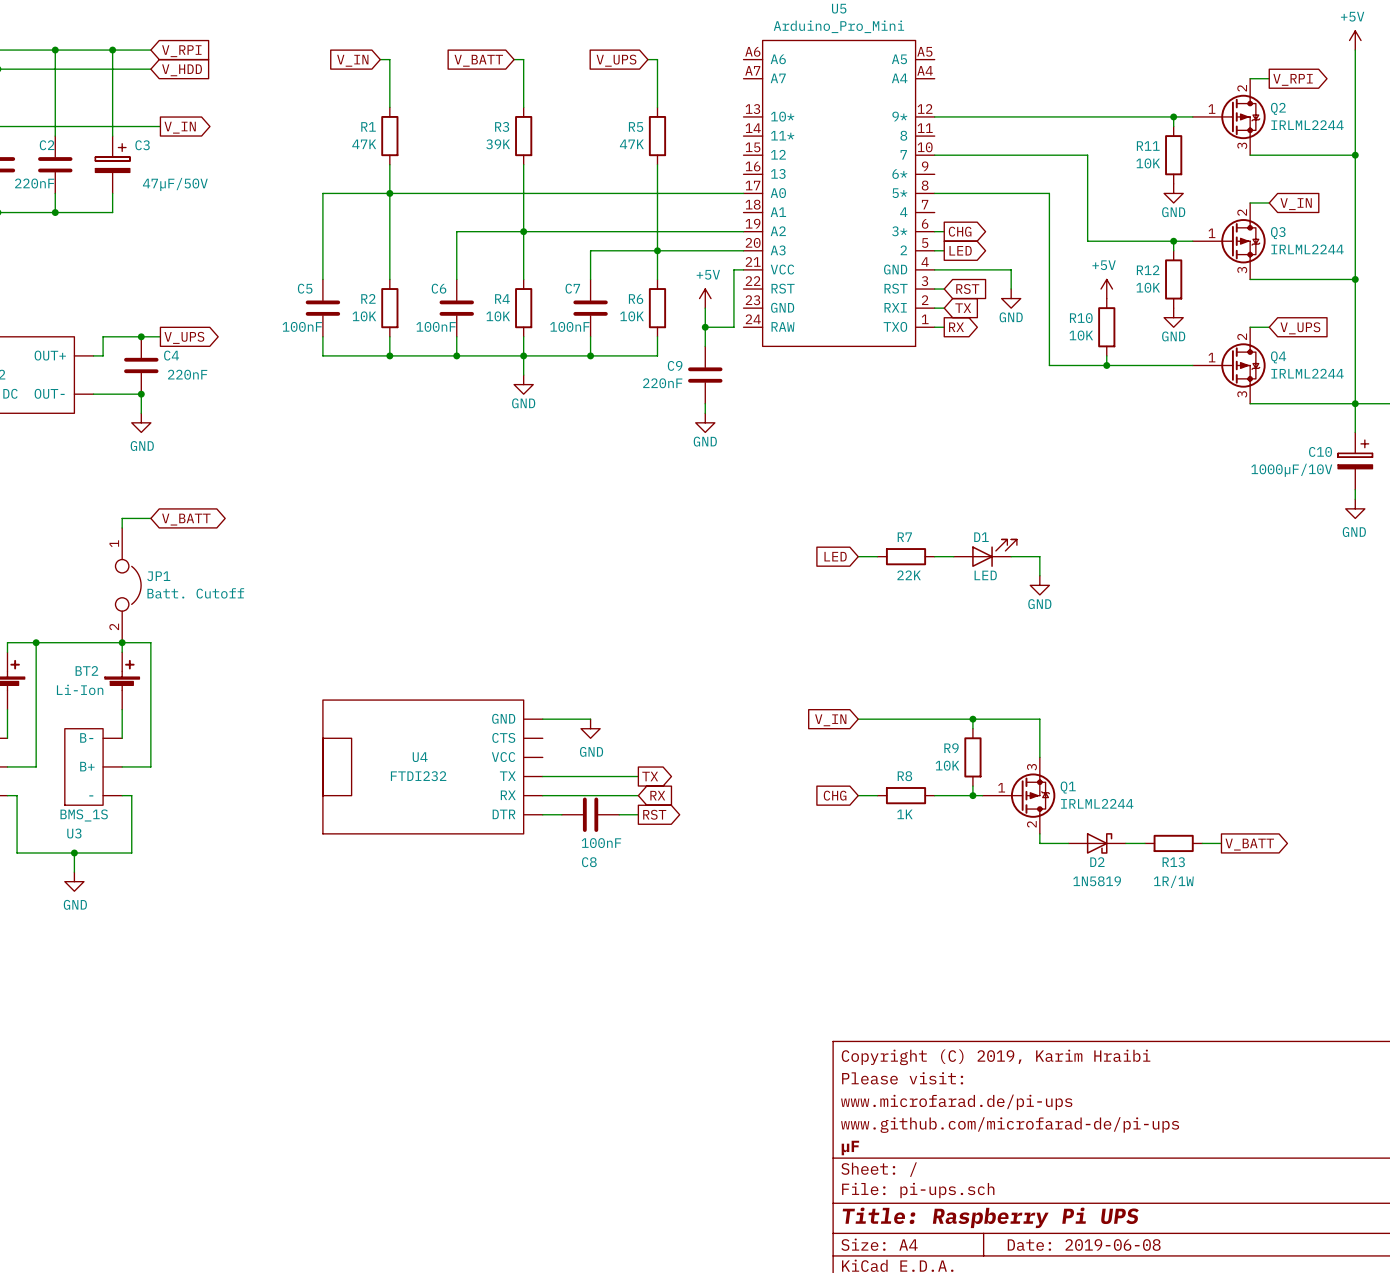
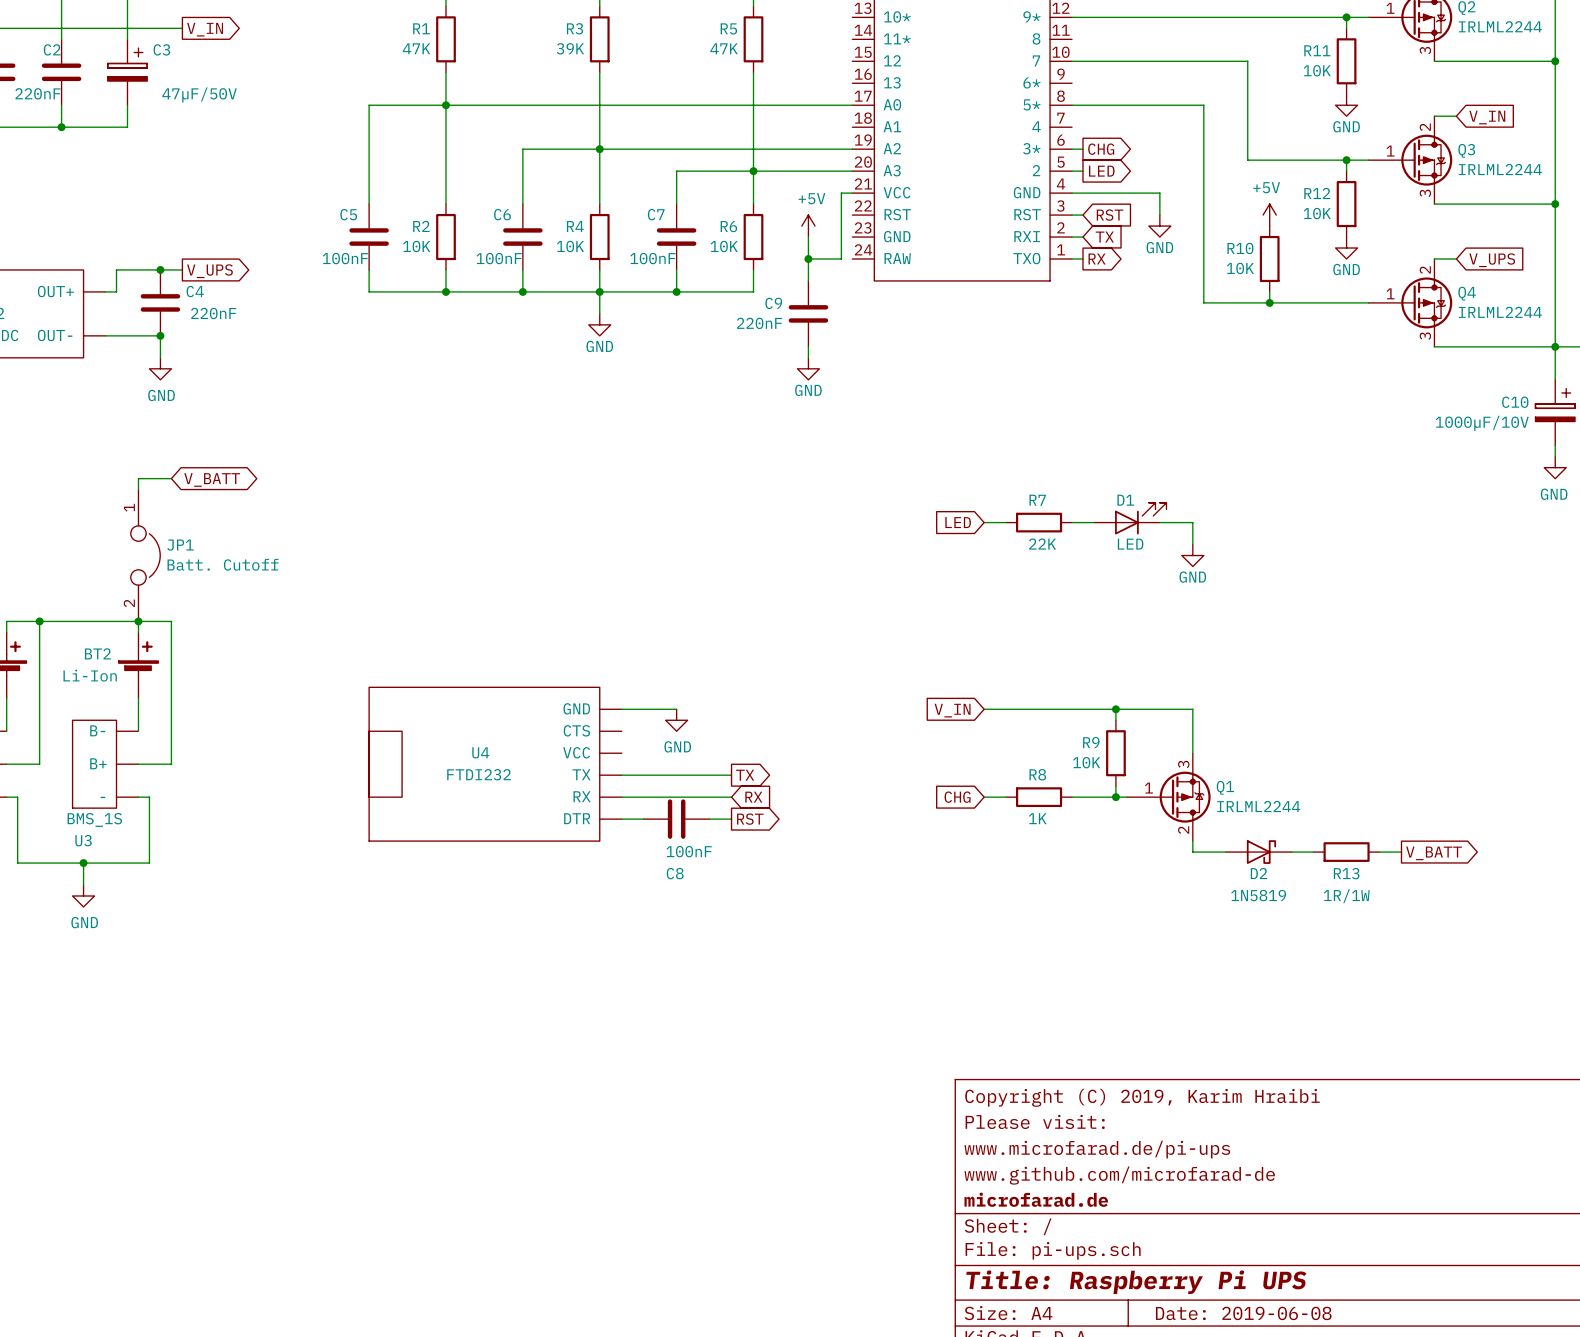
title block: www.github.com/microfarad-de/pi-ups (1010, 1125) -> www.github.com/microfarad-de (1119, 1175)
title block: µF (850, 1148) -> microfarad.de (1036, 1199)

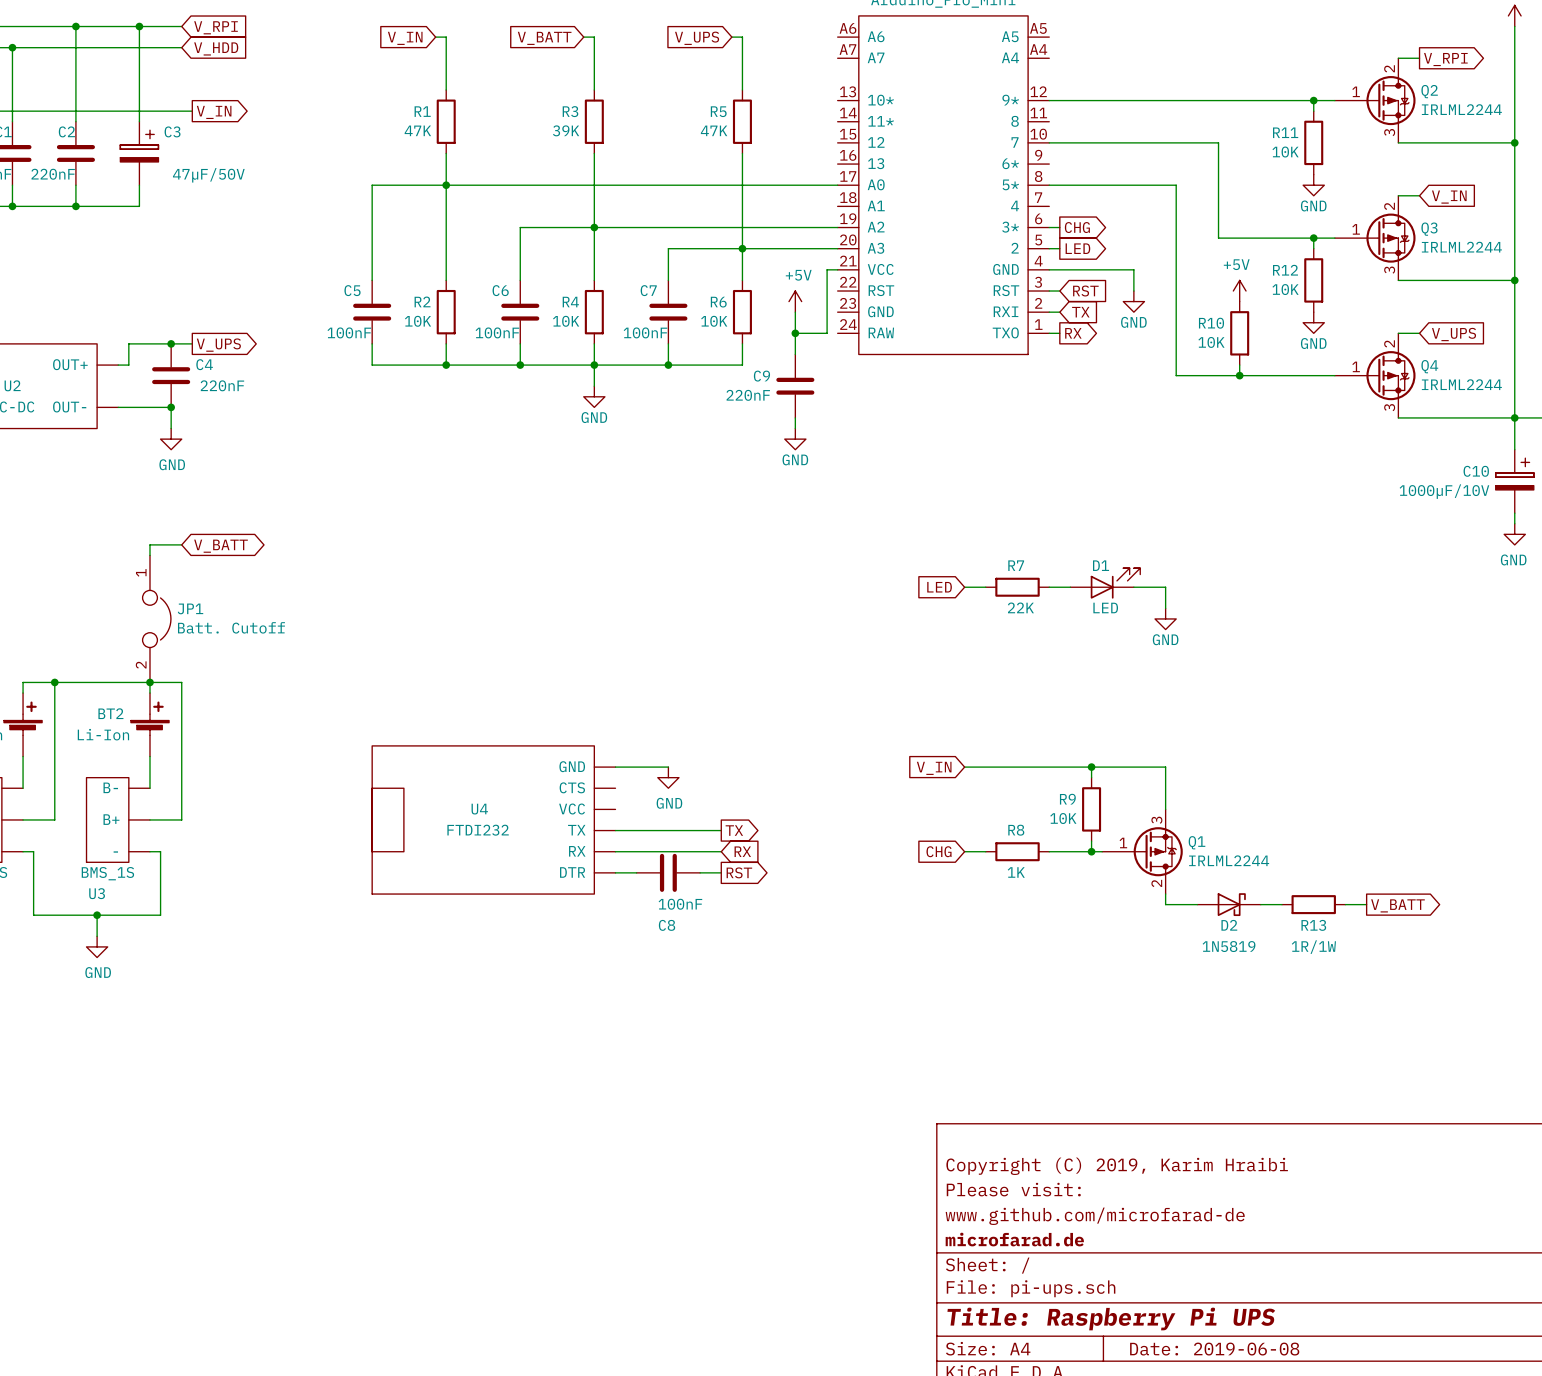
title block: Copyright (C) 2019, Karim Hraibi (1142, 1097) -> none
title block: Please visit: (1035, 1121) -> Copyright (C) 2019, Karim Hraibi (1117, 1166)
title block: www.microfarad.de/pi-ups (1097, 1149) -> Please visit: (1013, 1189)

